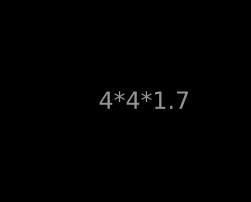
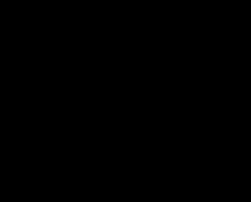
part: 4*4*1.7 (143, 100) -> none

